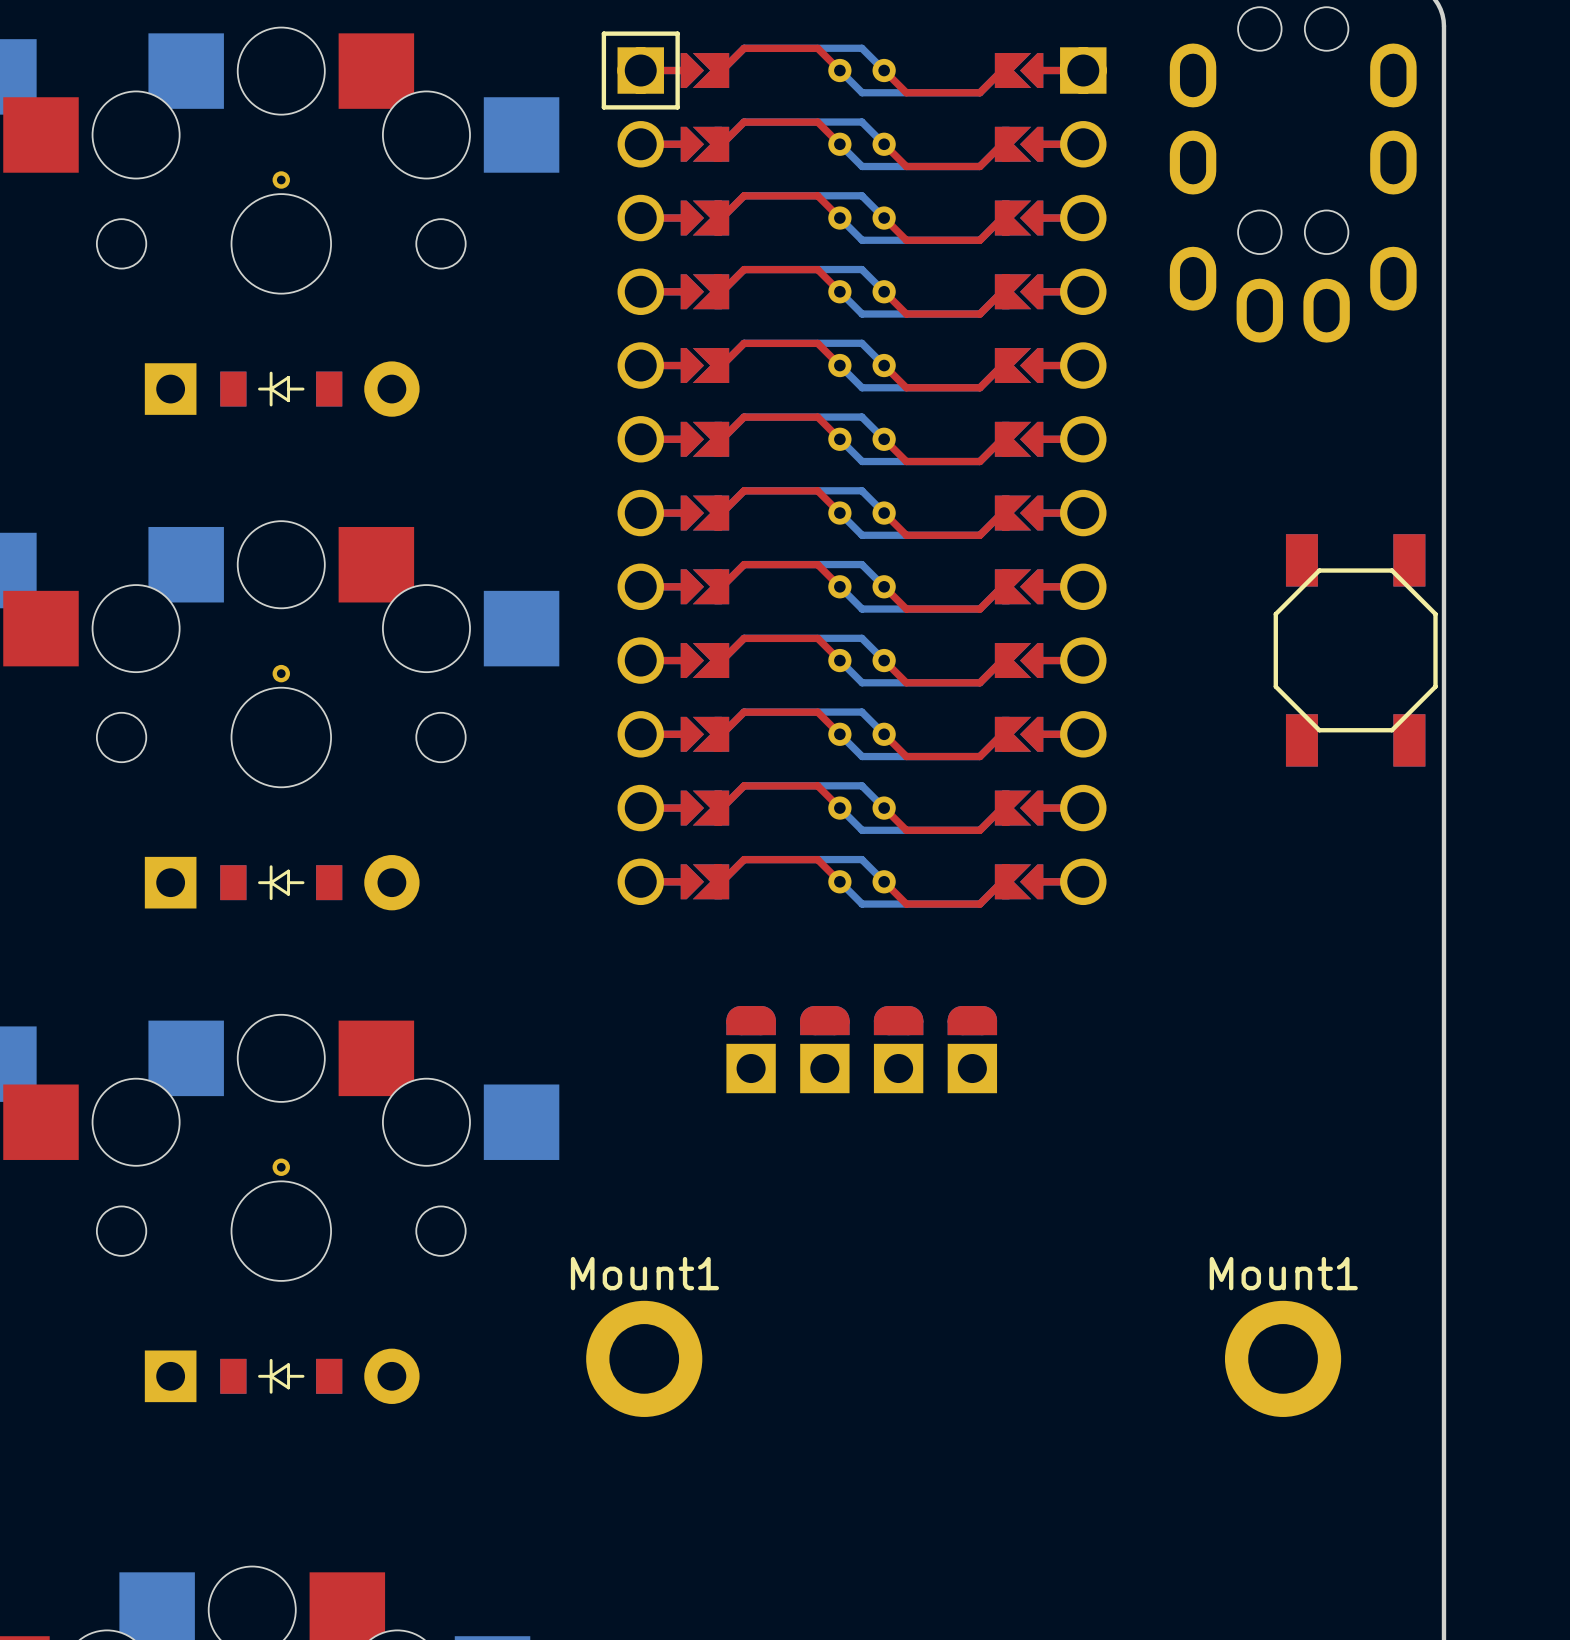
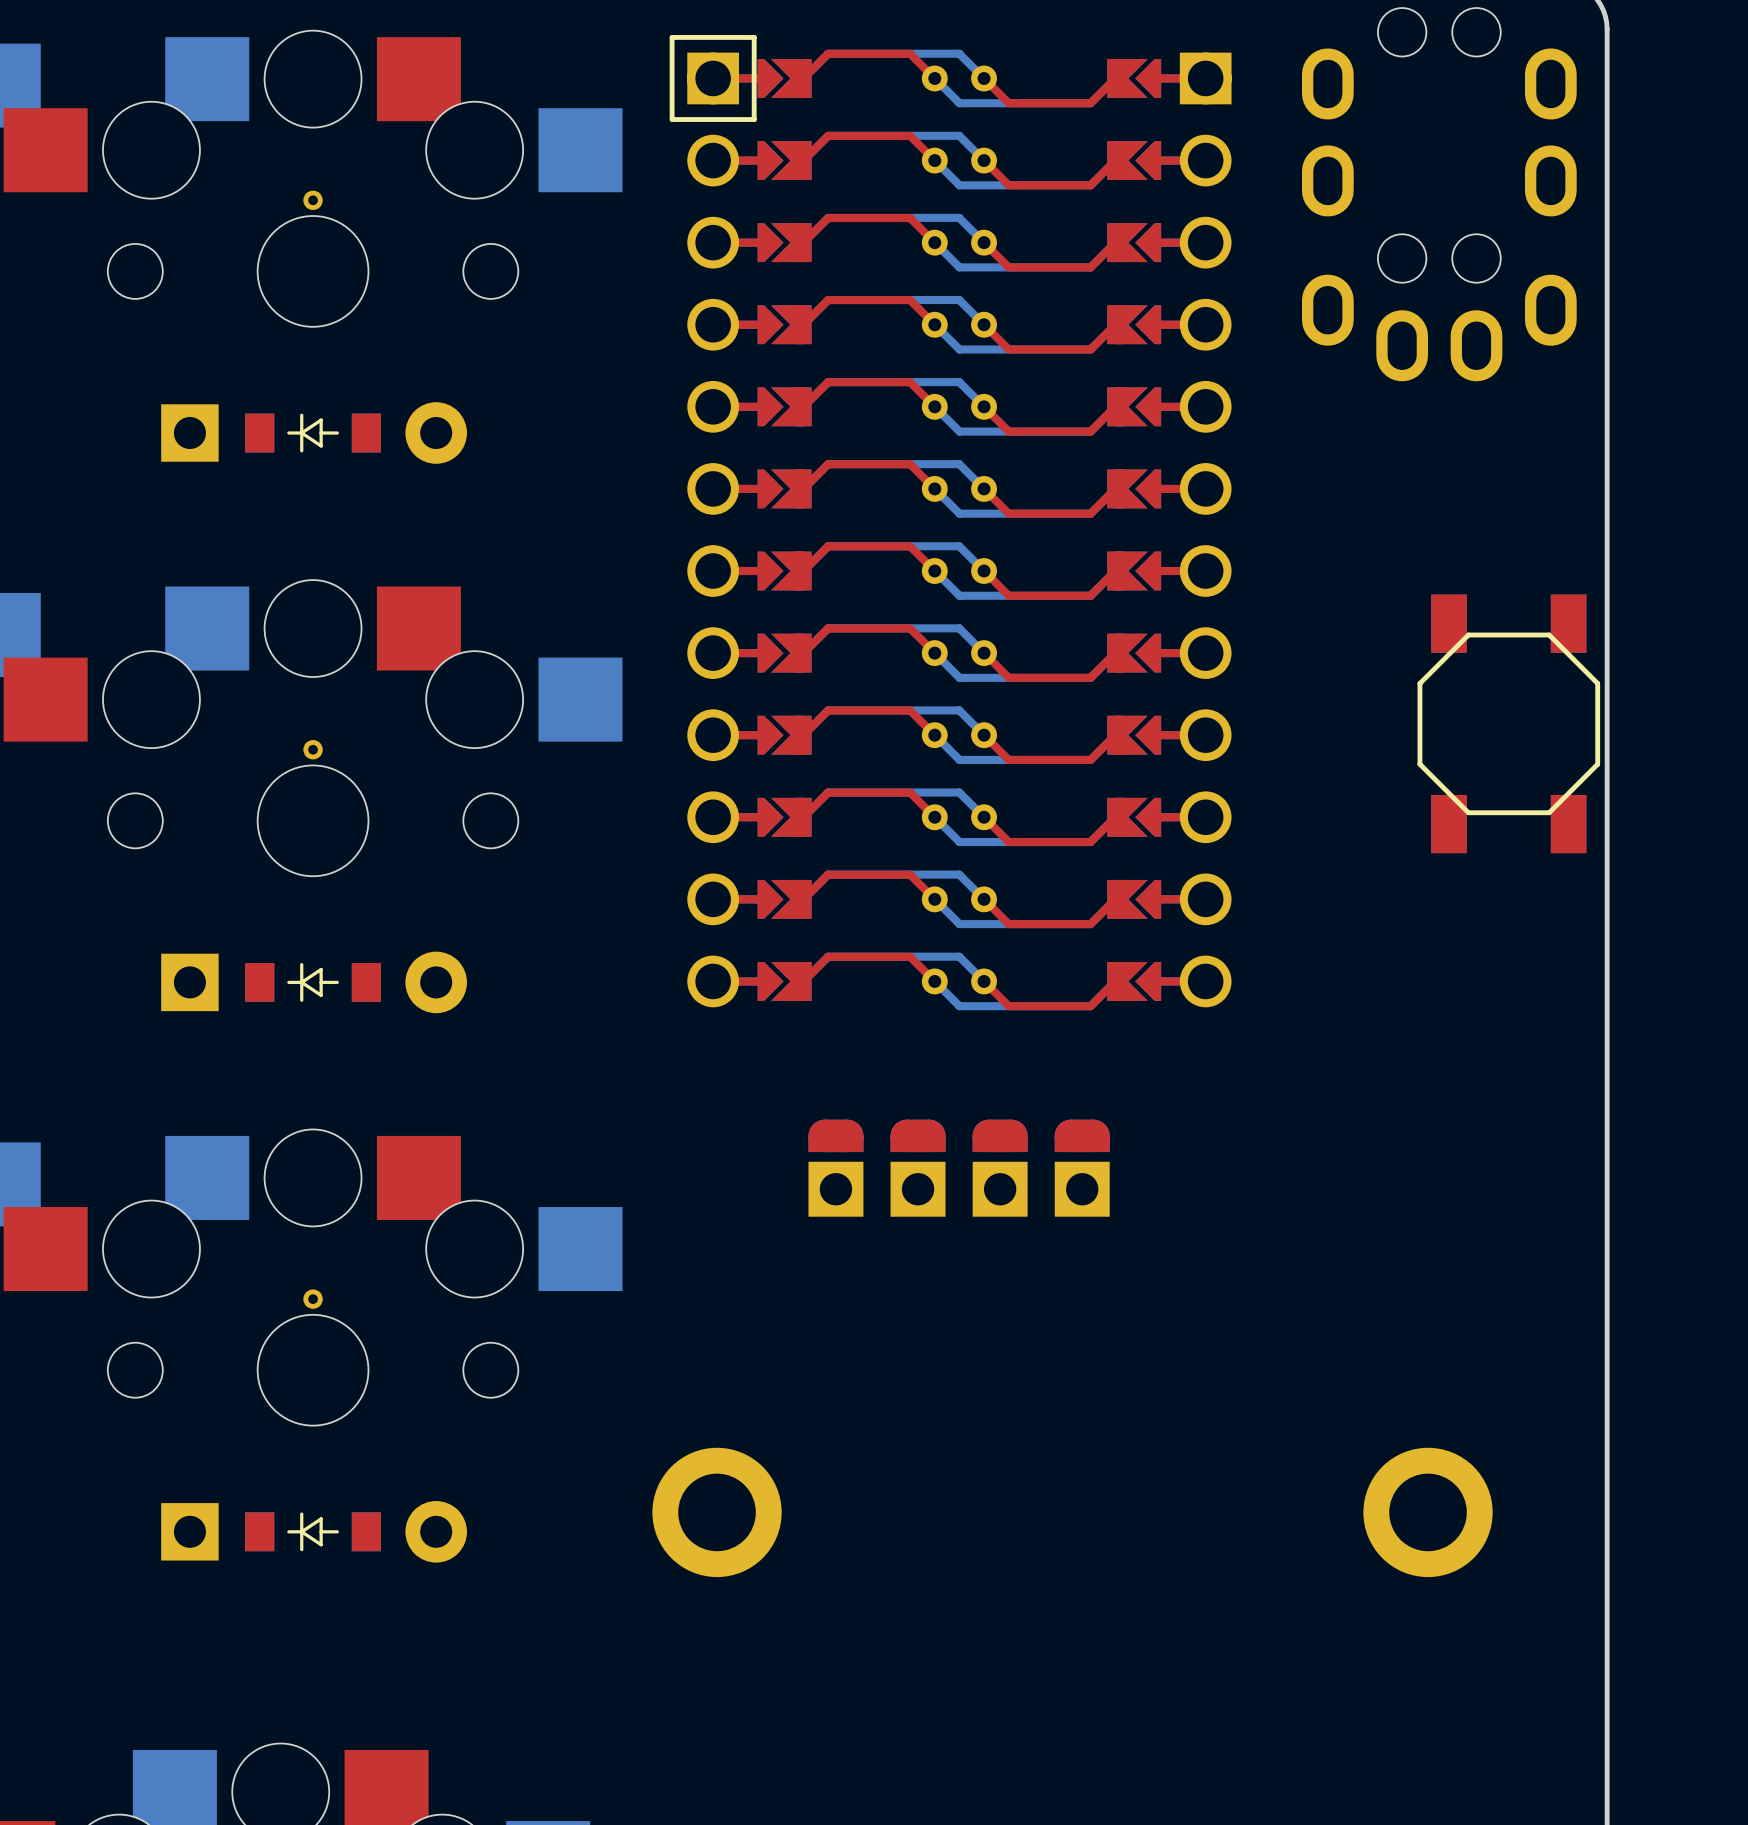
Mount1 name: Mount1 (644, 1273) -> none
Mount1 name: Mount1 (1283, 1273) -> none

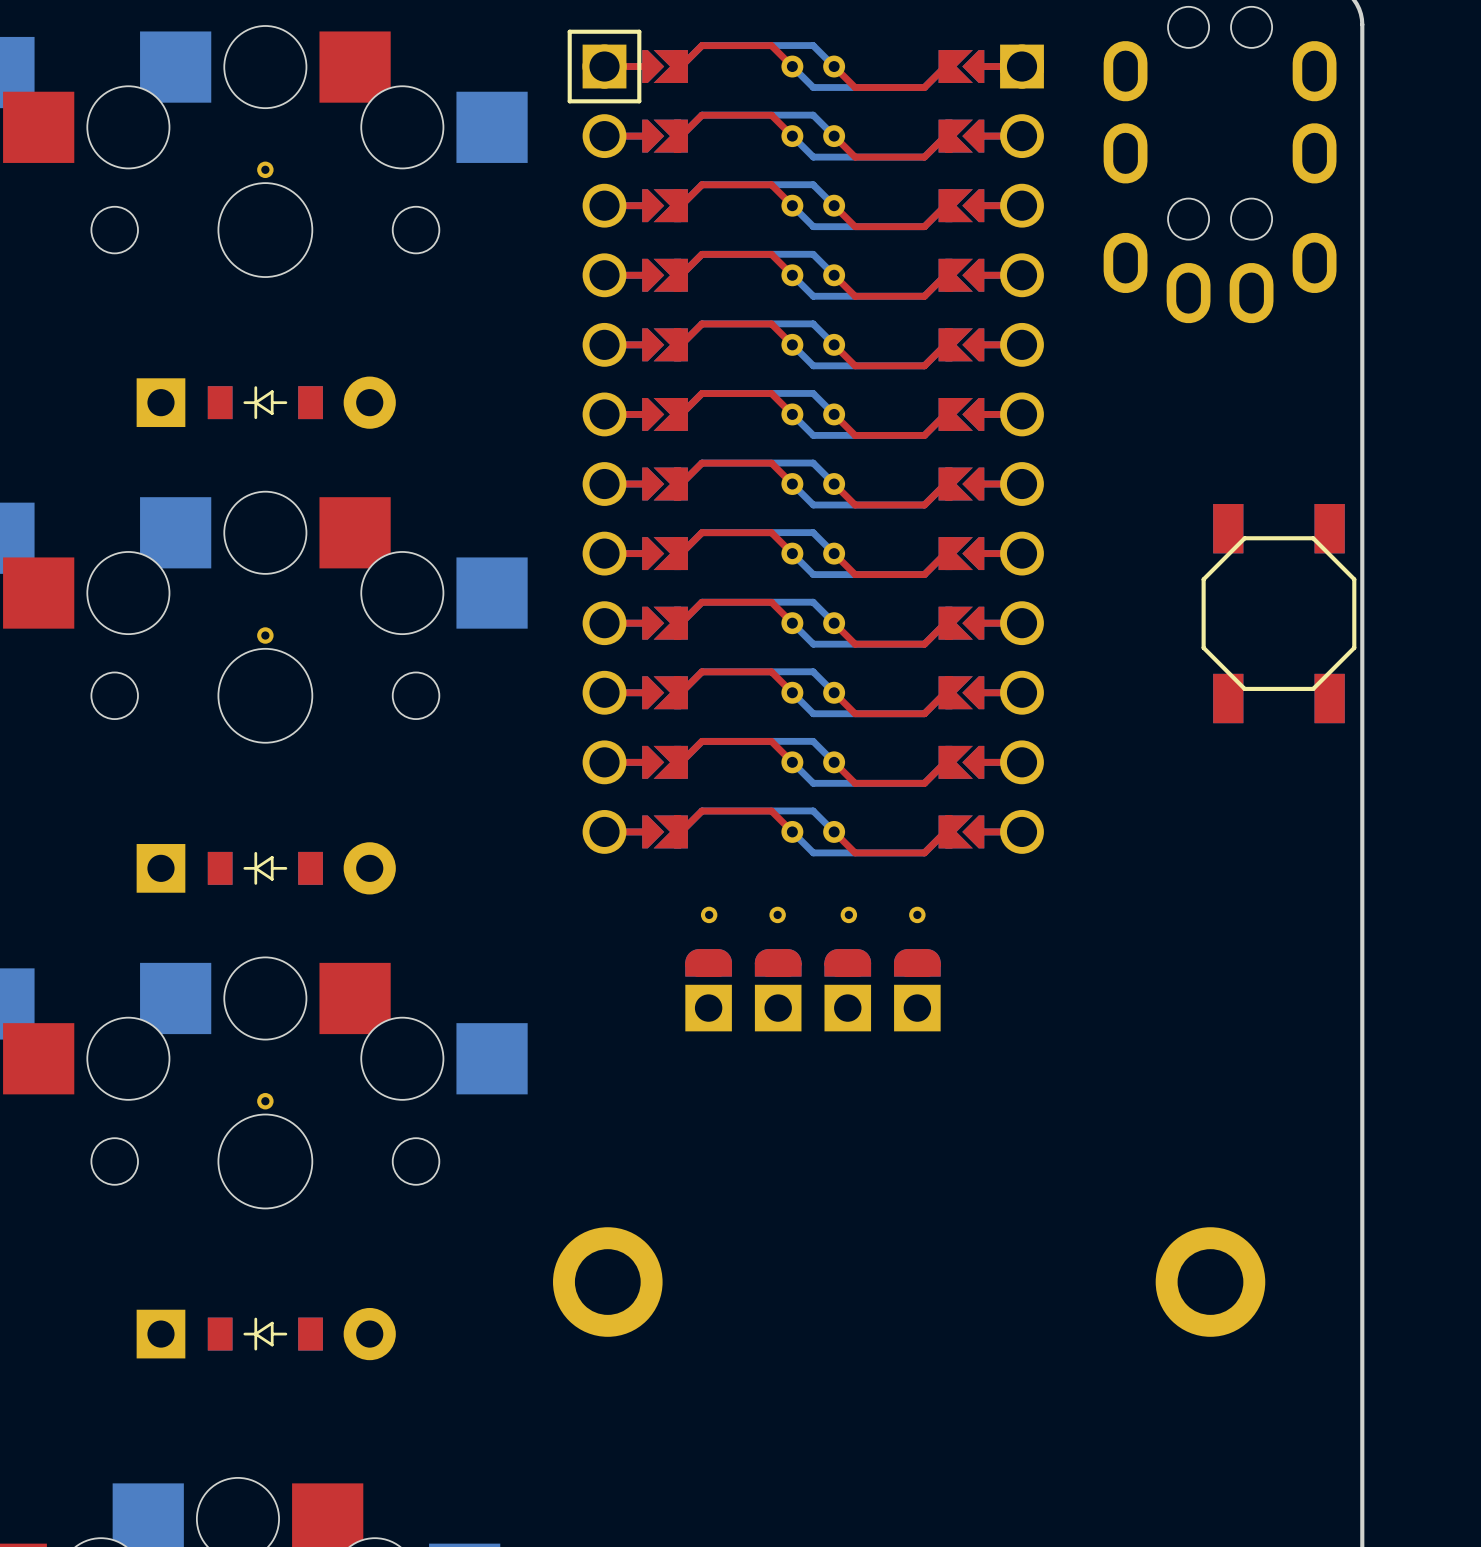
part position: (314, 433) -> (266, 402)
part position: (314, 982) -> (266, 868)
part: none -> (709, 914)
part: none -> (777, 914)
part: none -> (848, 914)
part: none -> (917, 914)
part position: (314, 1531) -> (266, 1334)

